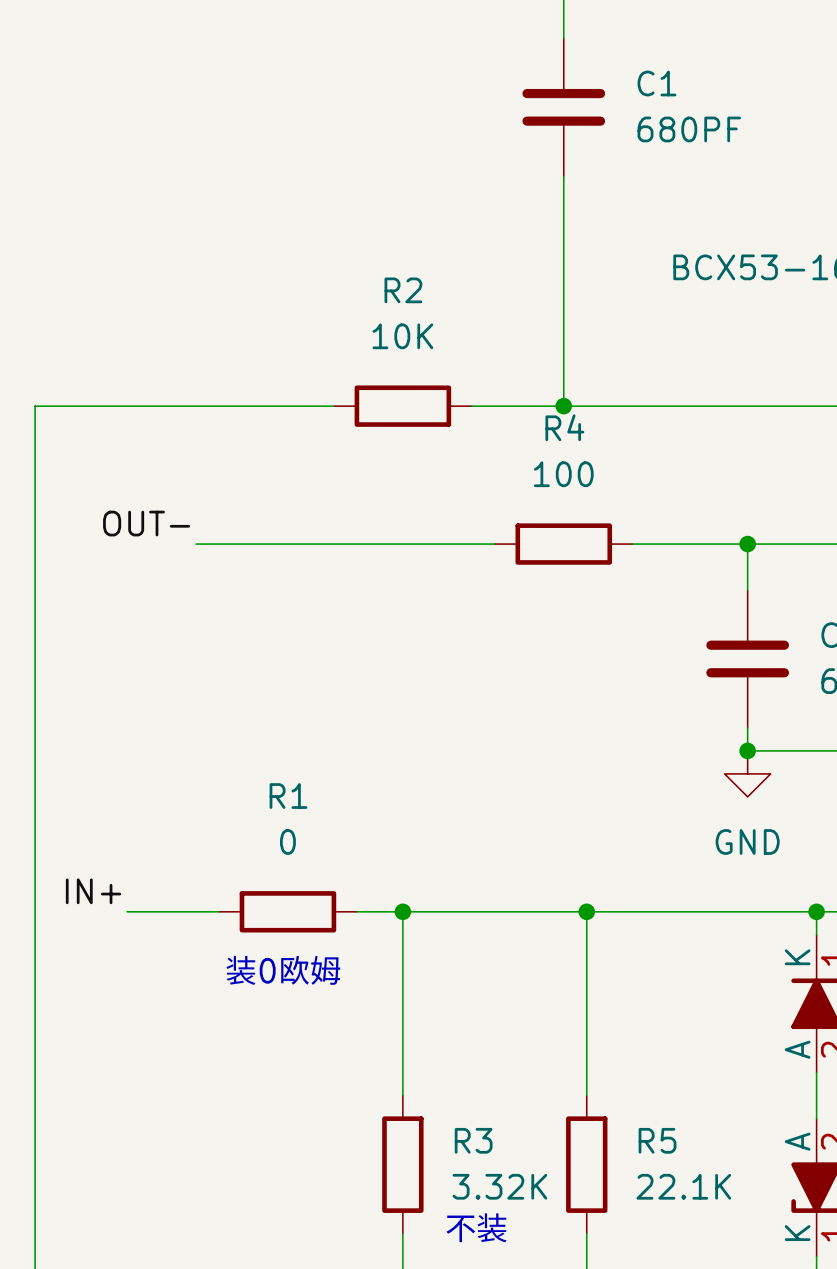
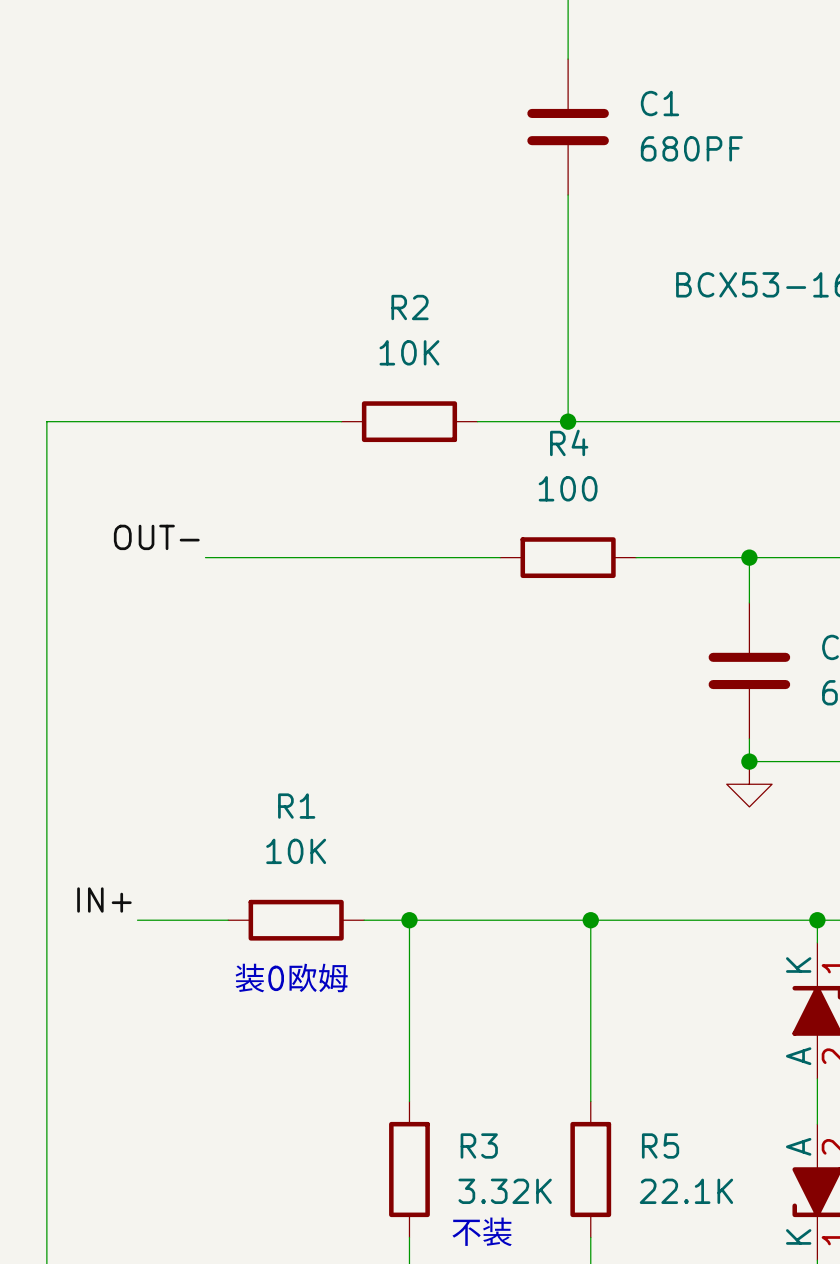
R1 value: 0 (287, 842) -> 10K (296, 851)
power symbol text: GND (747, 842) -> none

